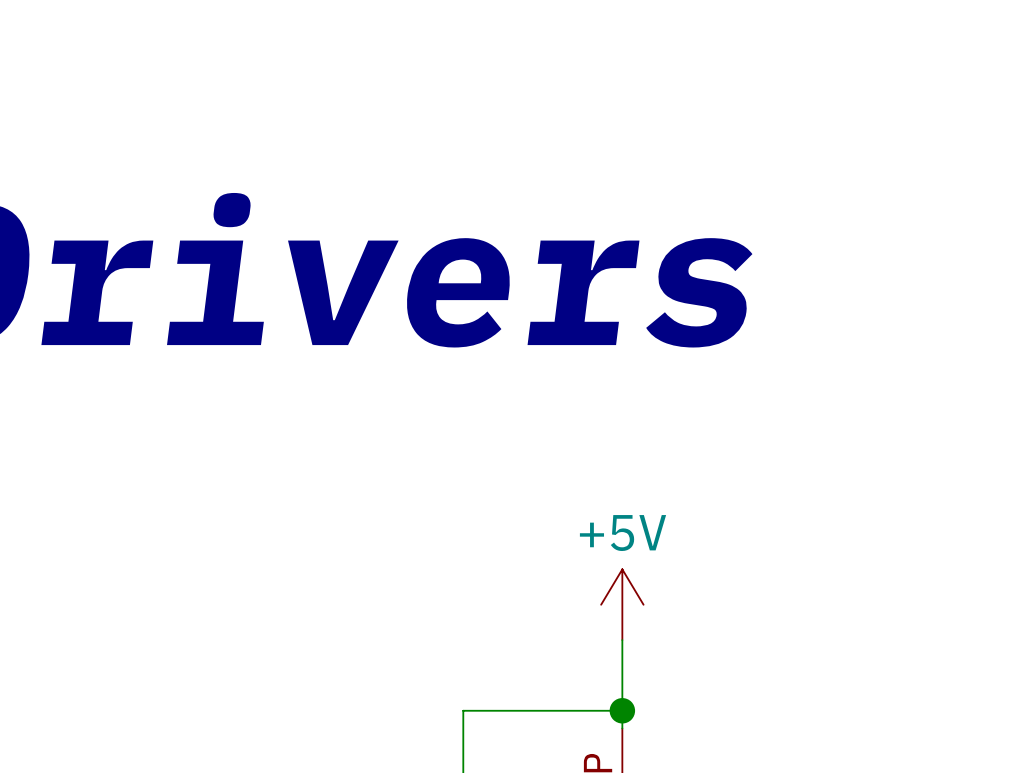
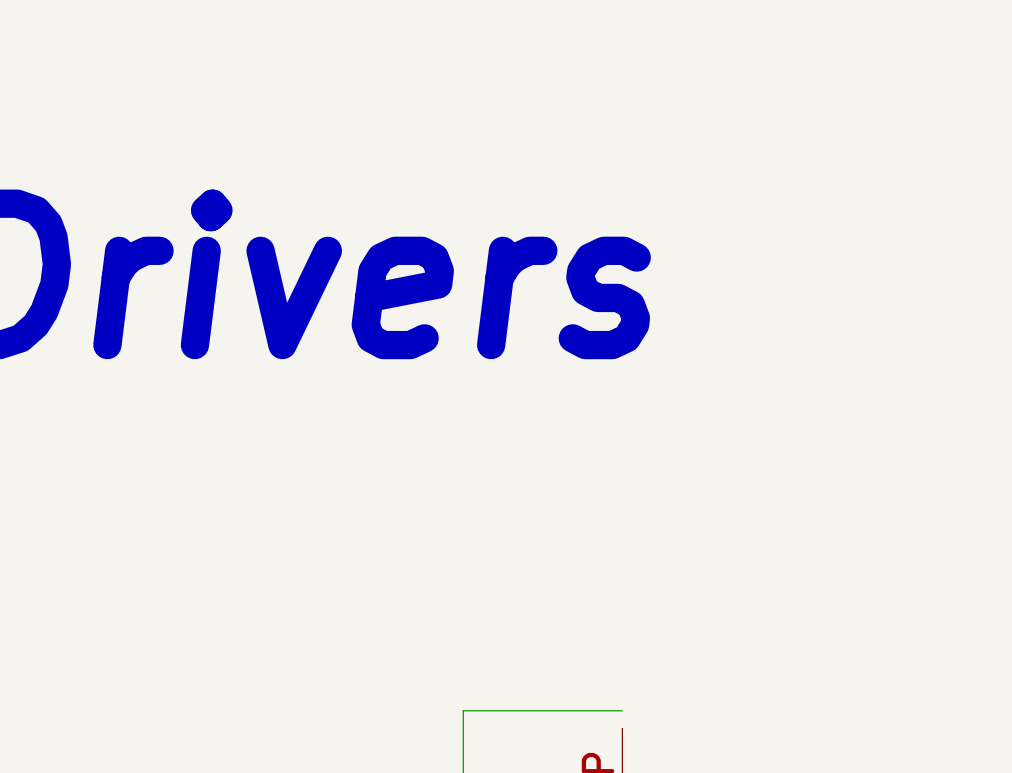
power symbol: +5V (622, 604) -> none
wire: (622, 640) (622, 728) -> none
junction: (622, 710) -> none

